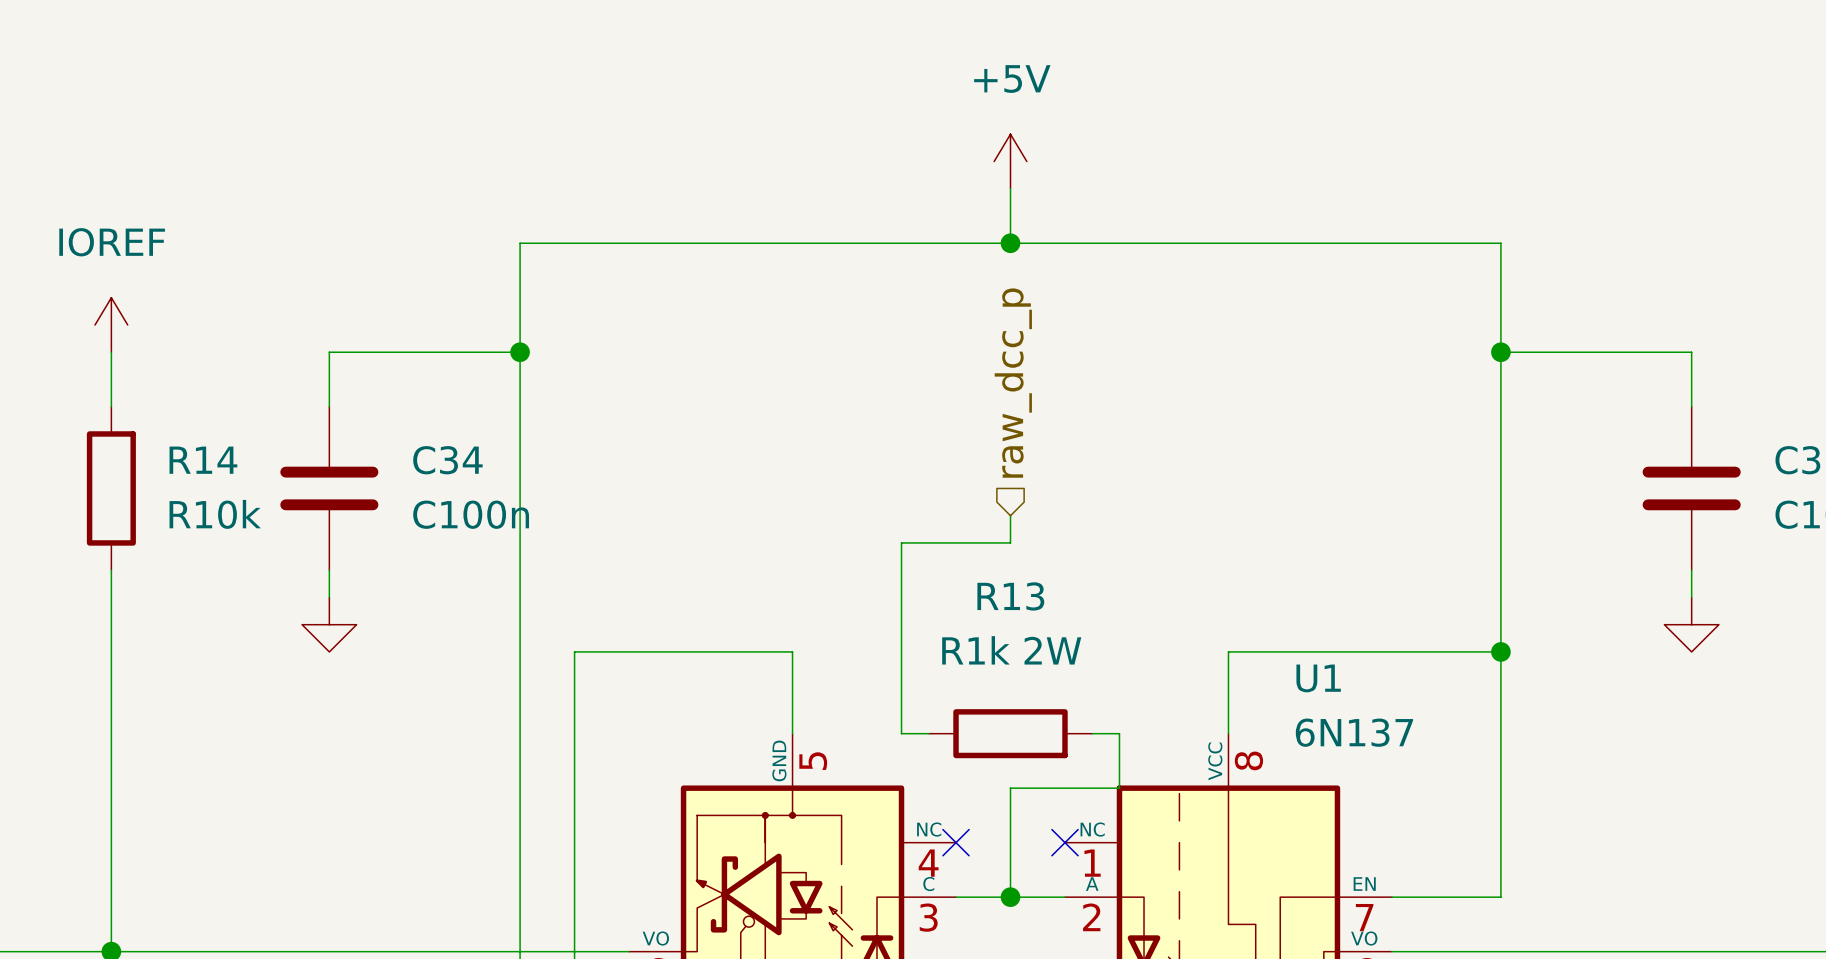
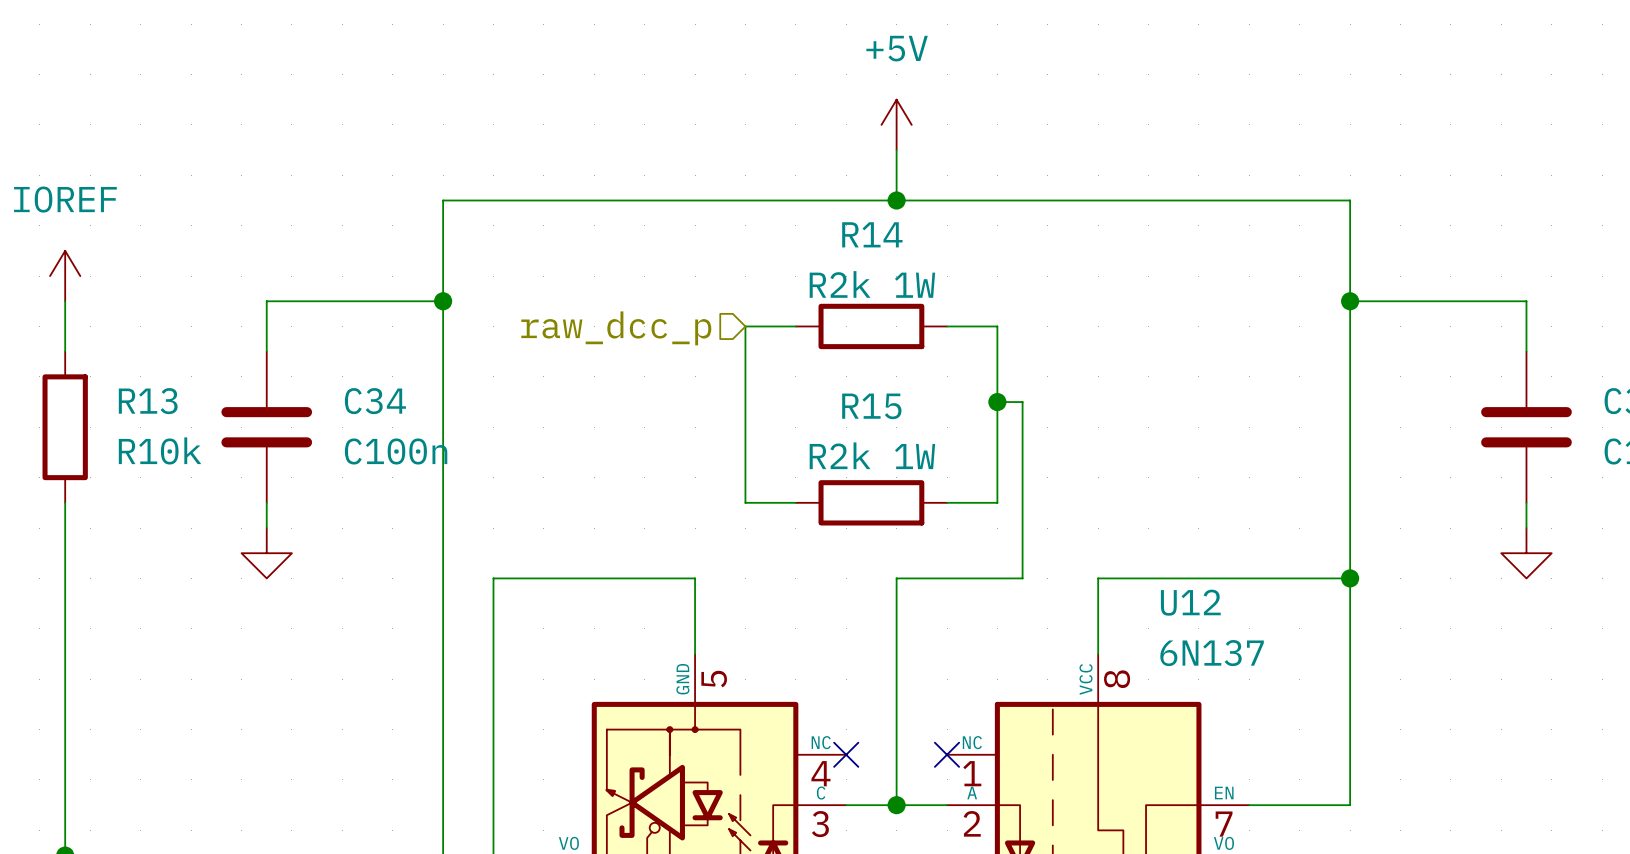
wire: none -> (795, 326) (745, 326) (745, 502) (795, 502)
R14: none -> R2k 1W (871, 326)
wire: none -> (947, 326) (997, 326) (997, 502) (947, 502)
hierarchical label rotation: 0° (1013, 383) -> 90° counterclockwise (616, 328)
hierarchical label position: raw_dcc_p (1013, 383) -> raw_dcc_p (616, 328)
R14 name: R14 (203, 460) -> R13 (148, 401)
junction: none -> (997, 402)
wire: (1010, 515) (1010, 542) (901, 542) (901, 733) (928, 733) -> none
R15: none -> R2k 1W (871, 502)
U1 name: U1 (1318, 678) -> U12 (1190, 602)
R13: R1k 2W (1010, 733) -> none
wire: (1092, 733) (1119, 733) (1119, 788) (1010, 788) -> (997, 402) (1022, 402) (1022, 578) (896, 578) (896, 704)

